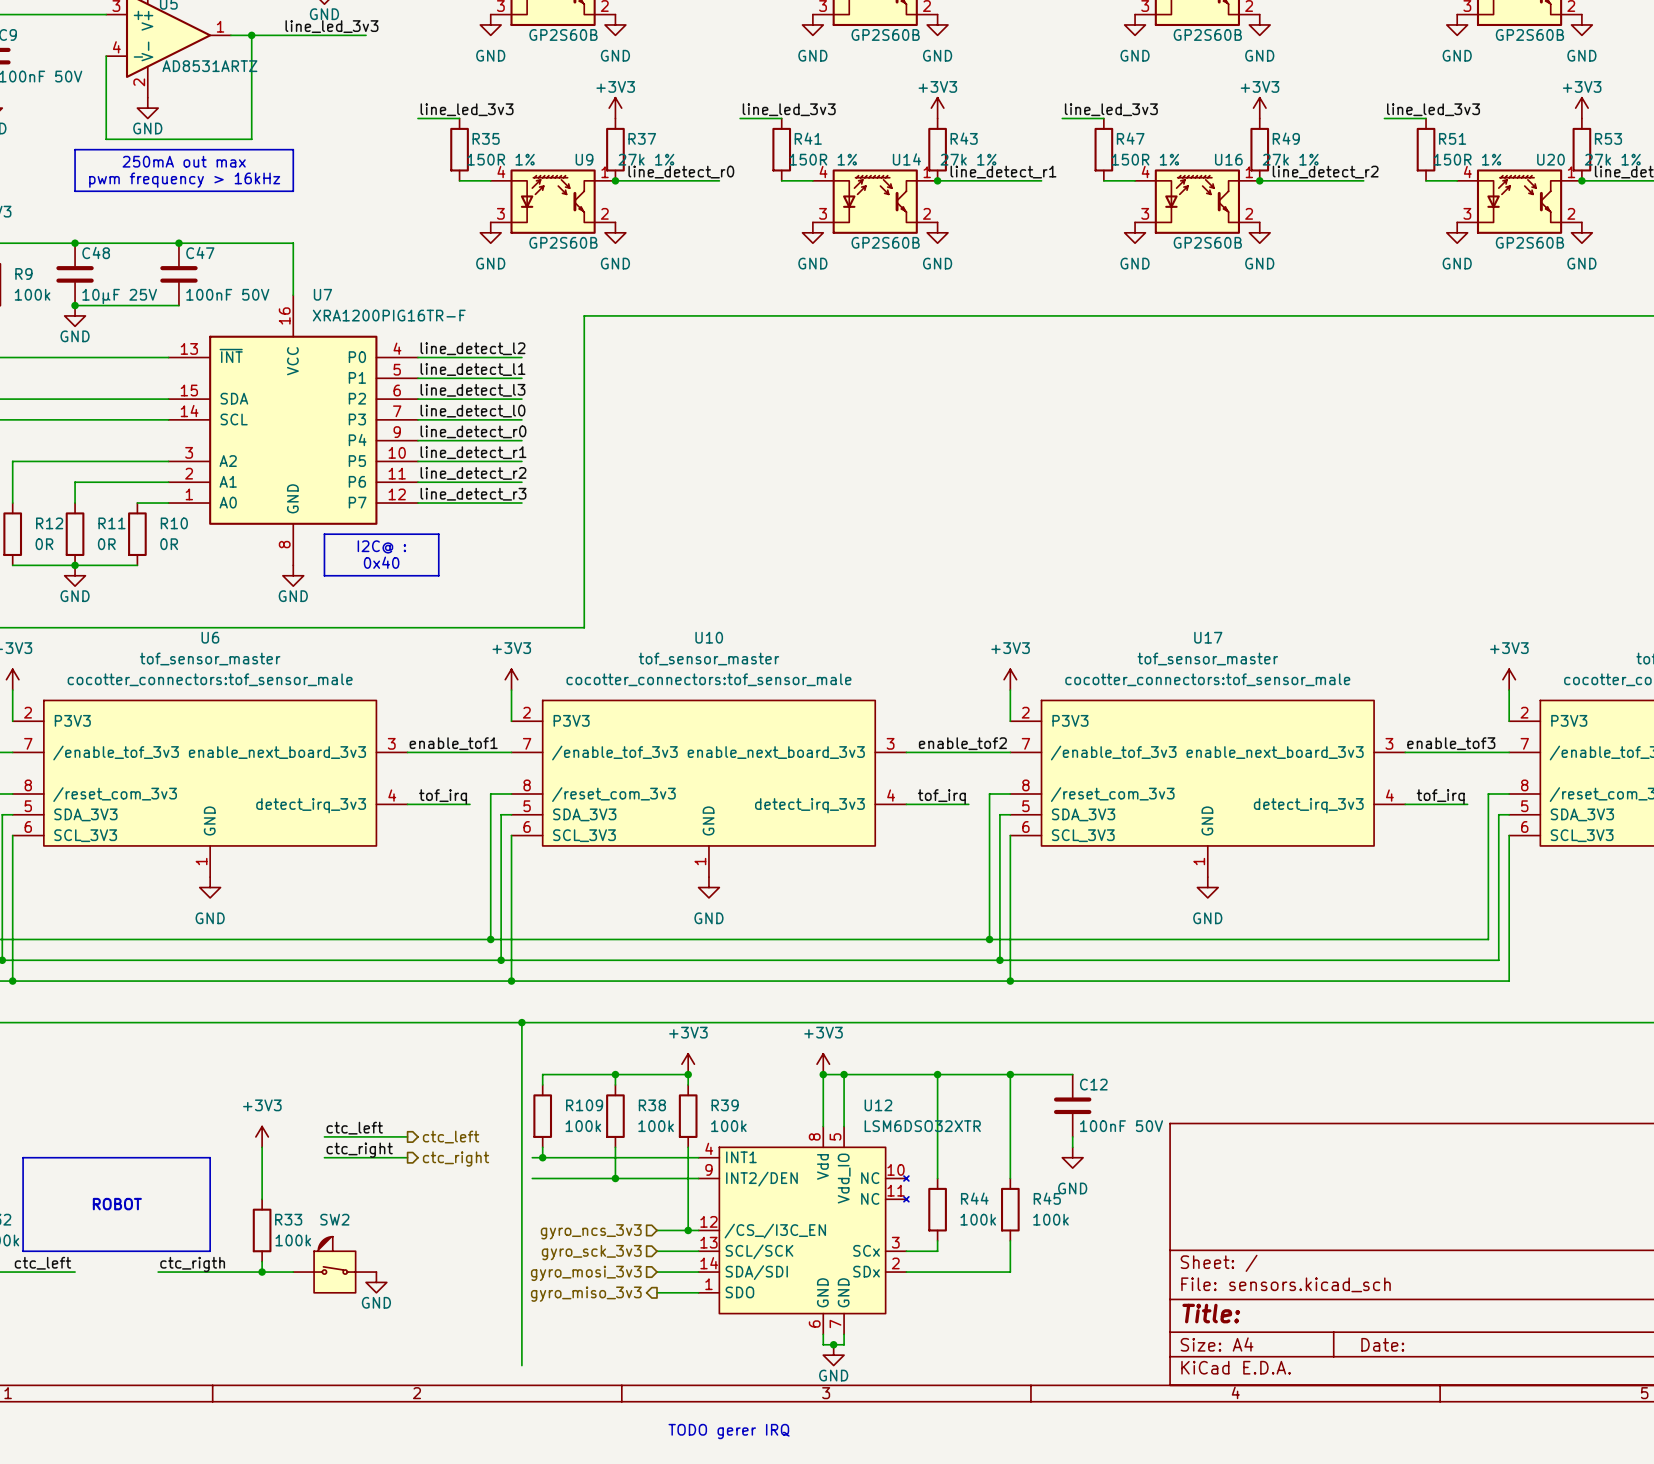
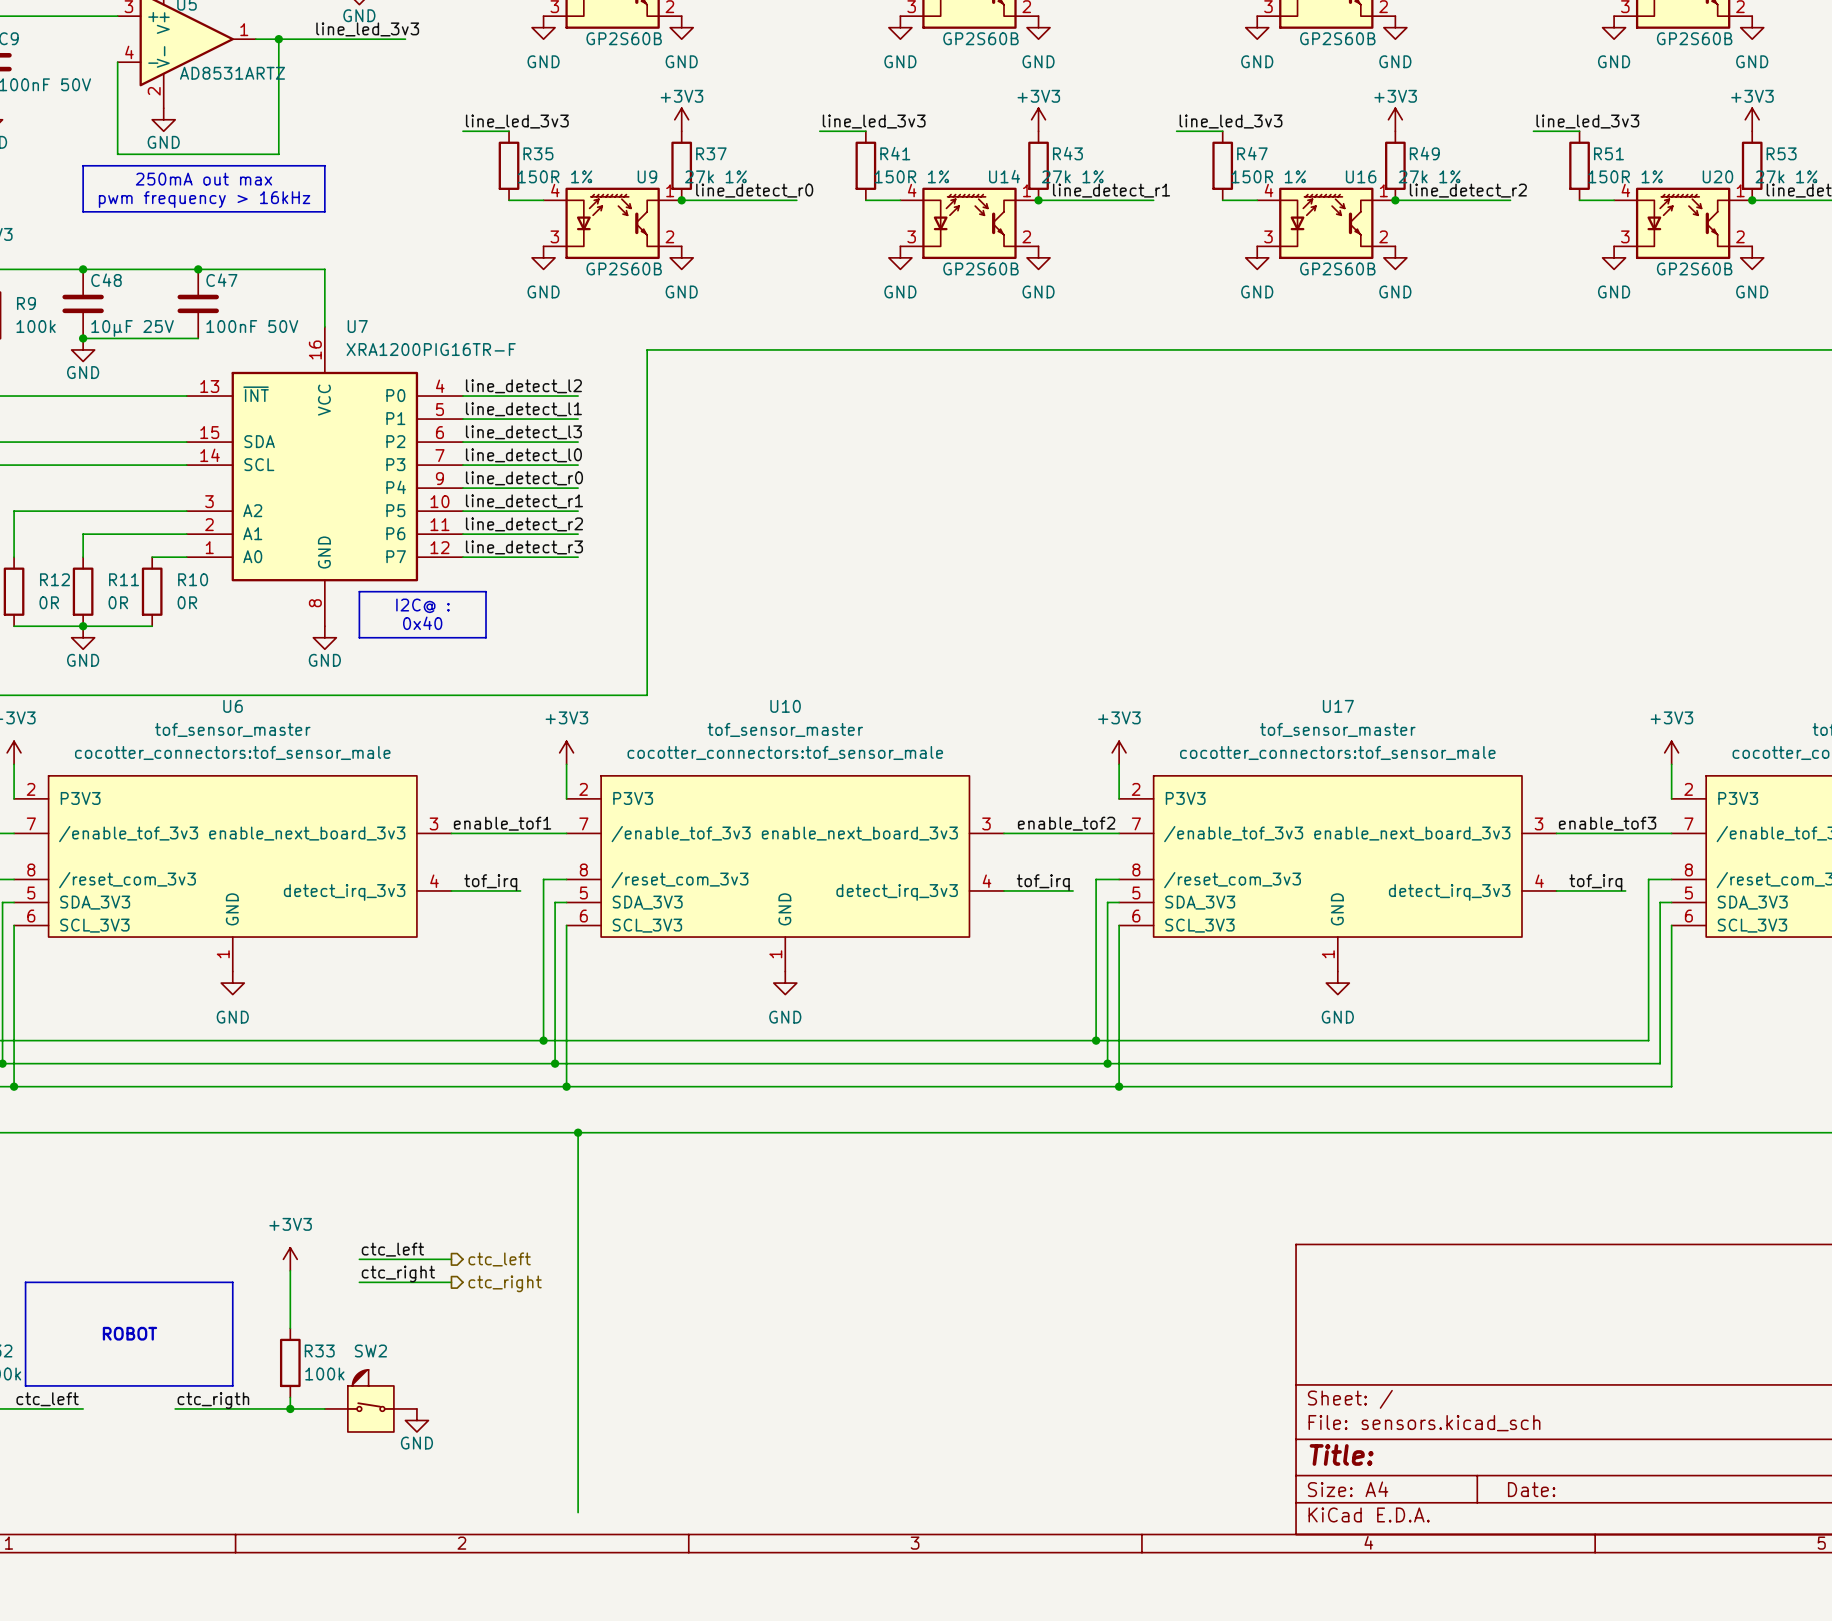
power symbol: +3V3 (688, 1064) -> none
power symbol: +3V3 (823, 1064) -> none
wire: (615, 1074) (615, 1084) -> none
junction: (615, 1074) -> none
junction: (688, 1074) -> none
junction: (823, 1074) -> none
wire: (844, 1074) (844, 1126) -> none
junction: (844, 1074) -> none
wire: (937, 1074) (937, 1178) -> none
junction: (937, 1074) -> none
wire: (1010, 1074) (1010, 1178) -> none
junction: (1010, 1074) -> none
wire: (1072, 1074) (823, 1074) (823, 1126) -> none
wire: (542, 1084) (542, 1074) (688, 1074) (688, 1084) -> none
C12: 100nF 50V (1072, 1105) -> none
R109: 100k (542, 1116) -> none
R38: 100k (615, 1116) -> none
R39: 100k (688, 1116) -> none
wire: (1072, 1136) (1072, 1147) -> none
wire: (542, 1147) (542, 1157) -> none
wire: (615, 1147) (615, 1178) -> none
wire: (688, 1147) (688, 1230) -> none
wire: (532, 1157) (698, 1157) -> none
junction: (542, 1157) -> none
power symbol: GND (1072, 1157) -> none
wire: (532, 1178) (698, 1178) -> none
junction: (615, 1178) -> none
R44: 100k (937, 1209) -> none
R45: 100k (1010, 1209) -> none
wire: (657, 1230) (698, 1230) -> none
junction: (688, 1230) -> none
U12: LSM6DSO32XTR (803, 1230) -> none
hierarchical label: gyro_ncs_3v3 (591, 1231) -> none
wire: (937, 1240) (937, 1251) (906, 1251) -> none
wire: (1010, 1240) (1010, 1272) (906, 1272) -> none
wire: (657, 1251) (698, 1251) -> none
hierarchical label: gyro_sck_3v3 (591, 1252) -> none
wire: (657, 1272) (698, 1272) -> none
hierarchical label: gyro_mosi_3v3 (586, 1273) -> none
wire: (657, 1292) (698, 1292) -> none
hierarchical label: gyro_miso_3v3 (586, 1294) -> none
wire: (823, 1334) (823, 1344) (844, 1344) (844, 1334) -> none
junction: (833, 1344) -> none
power symbol: GND (833, 1355) -> none
text: TODO gerer IRQ (729, 1431) -> none

